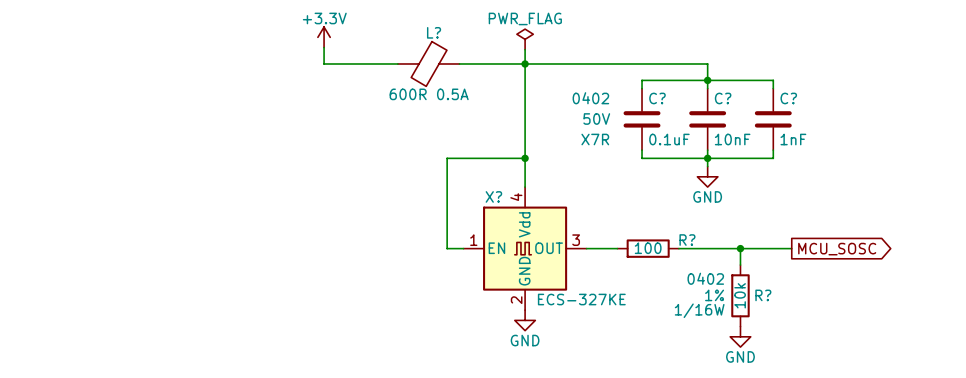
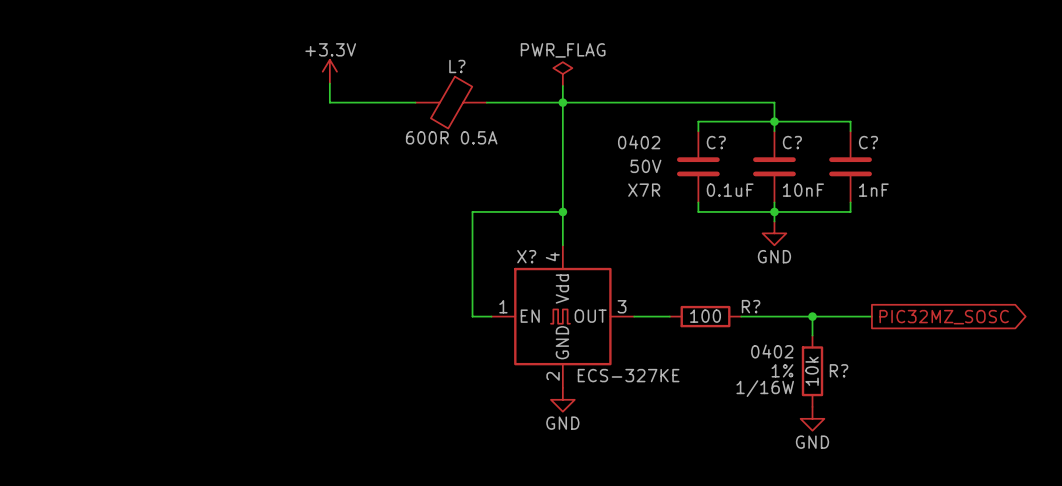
global label: MCU_SOSC (837, 249) -> PIC32MZ_SOSC (944, 317)

